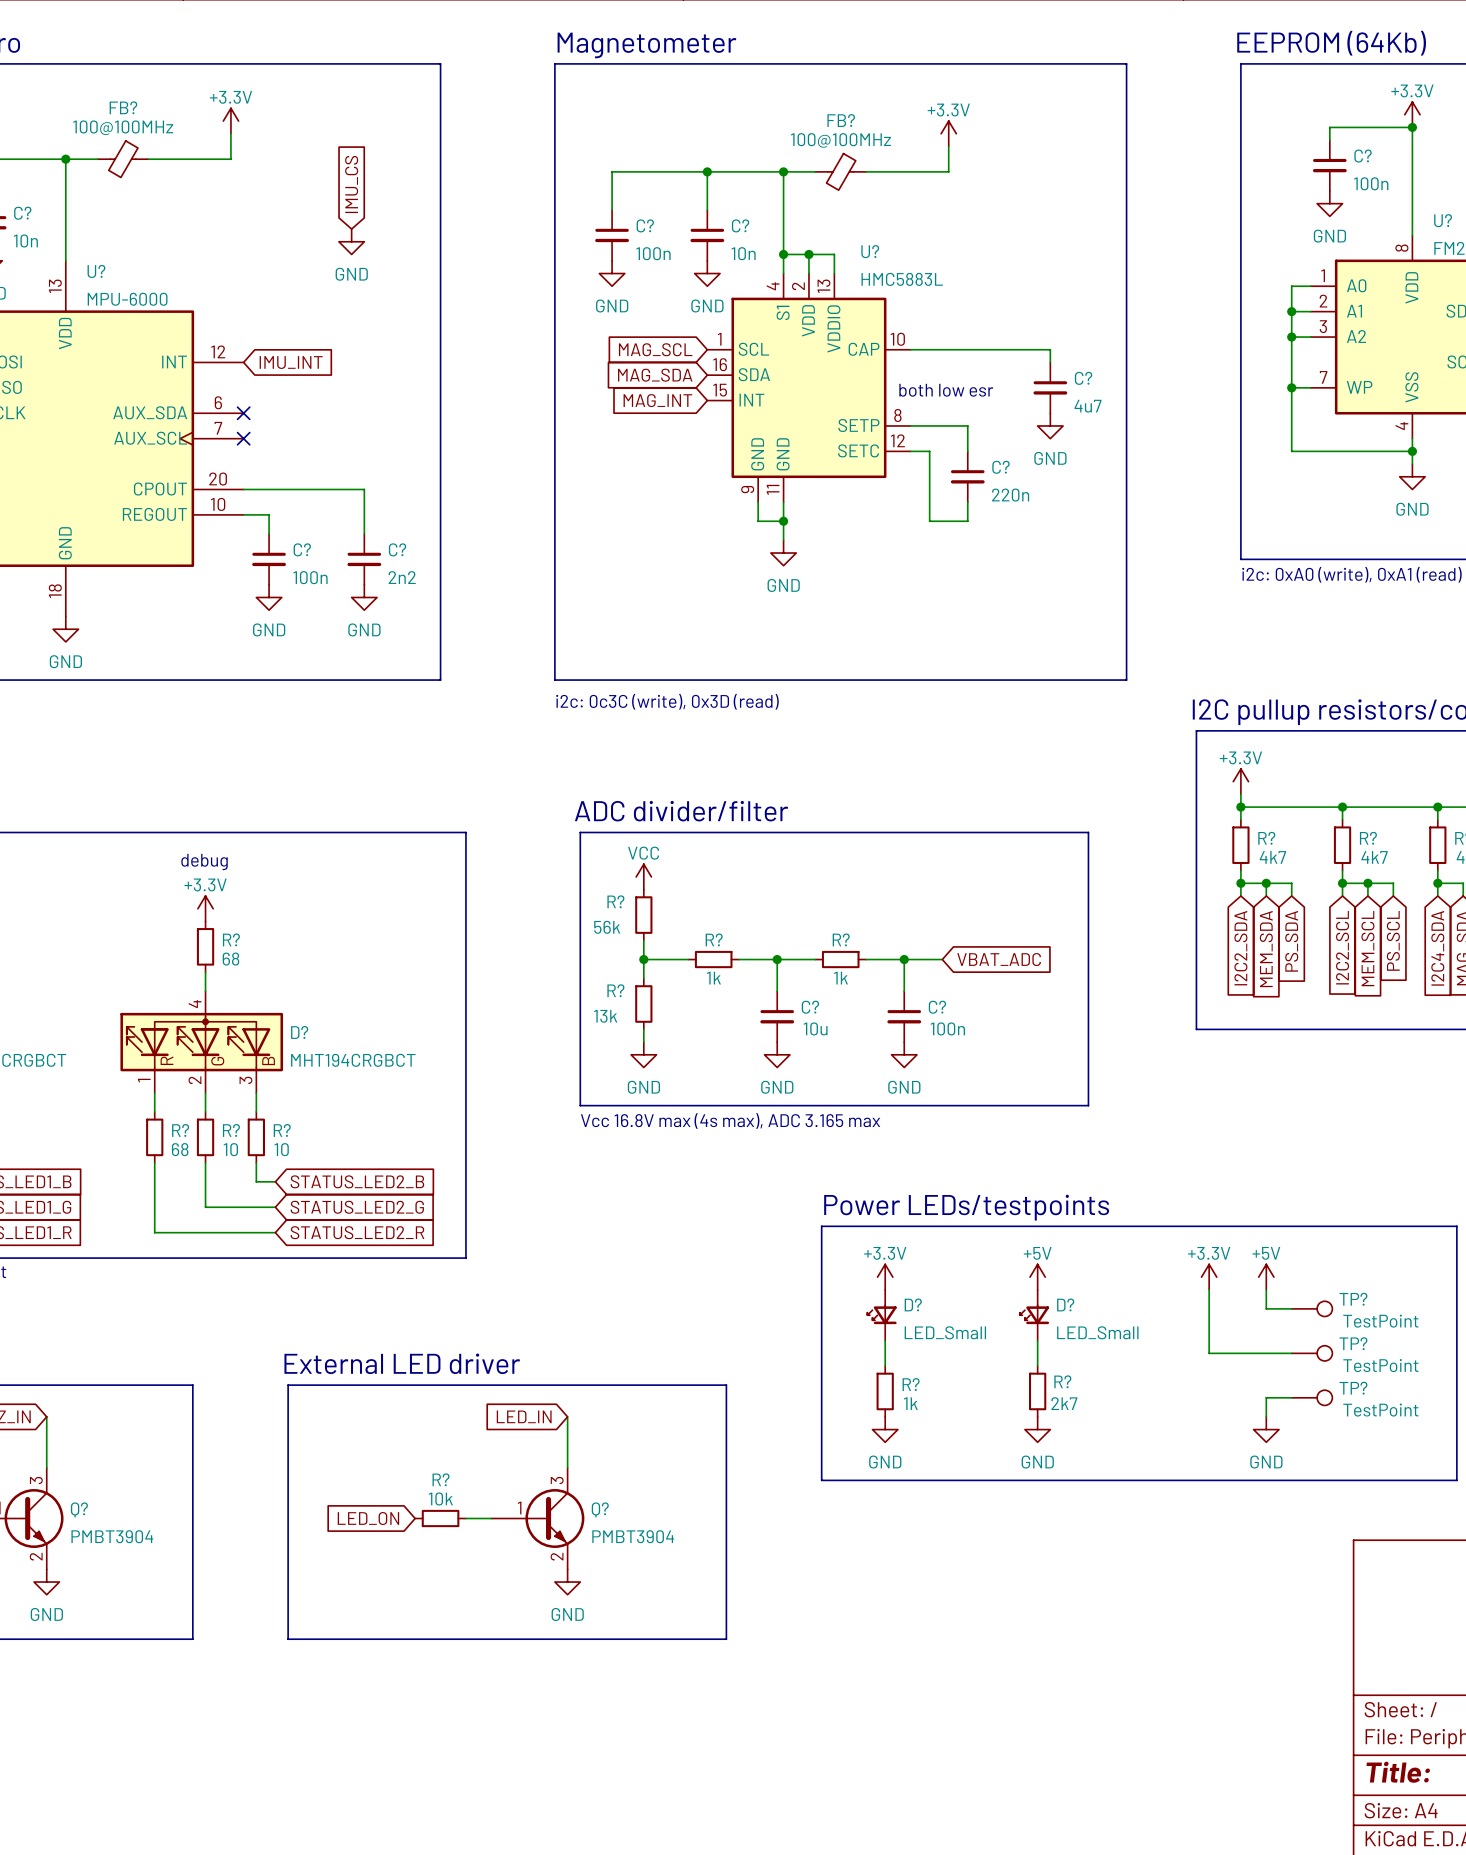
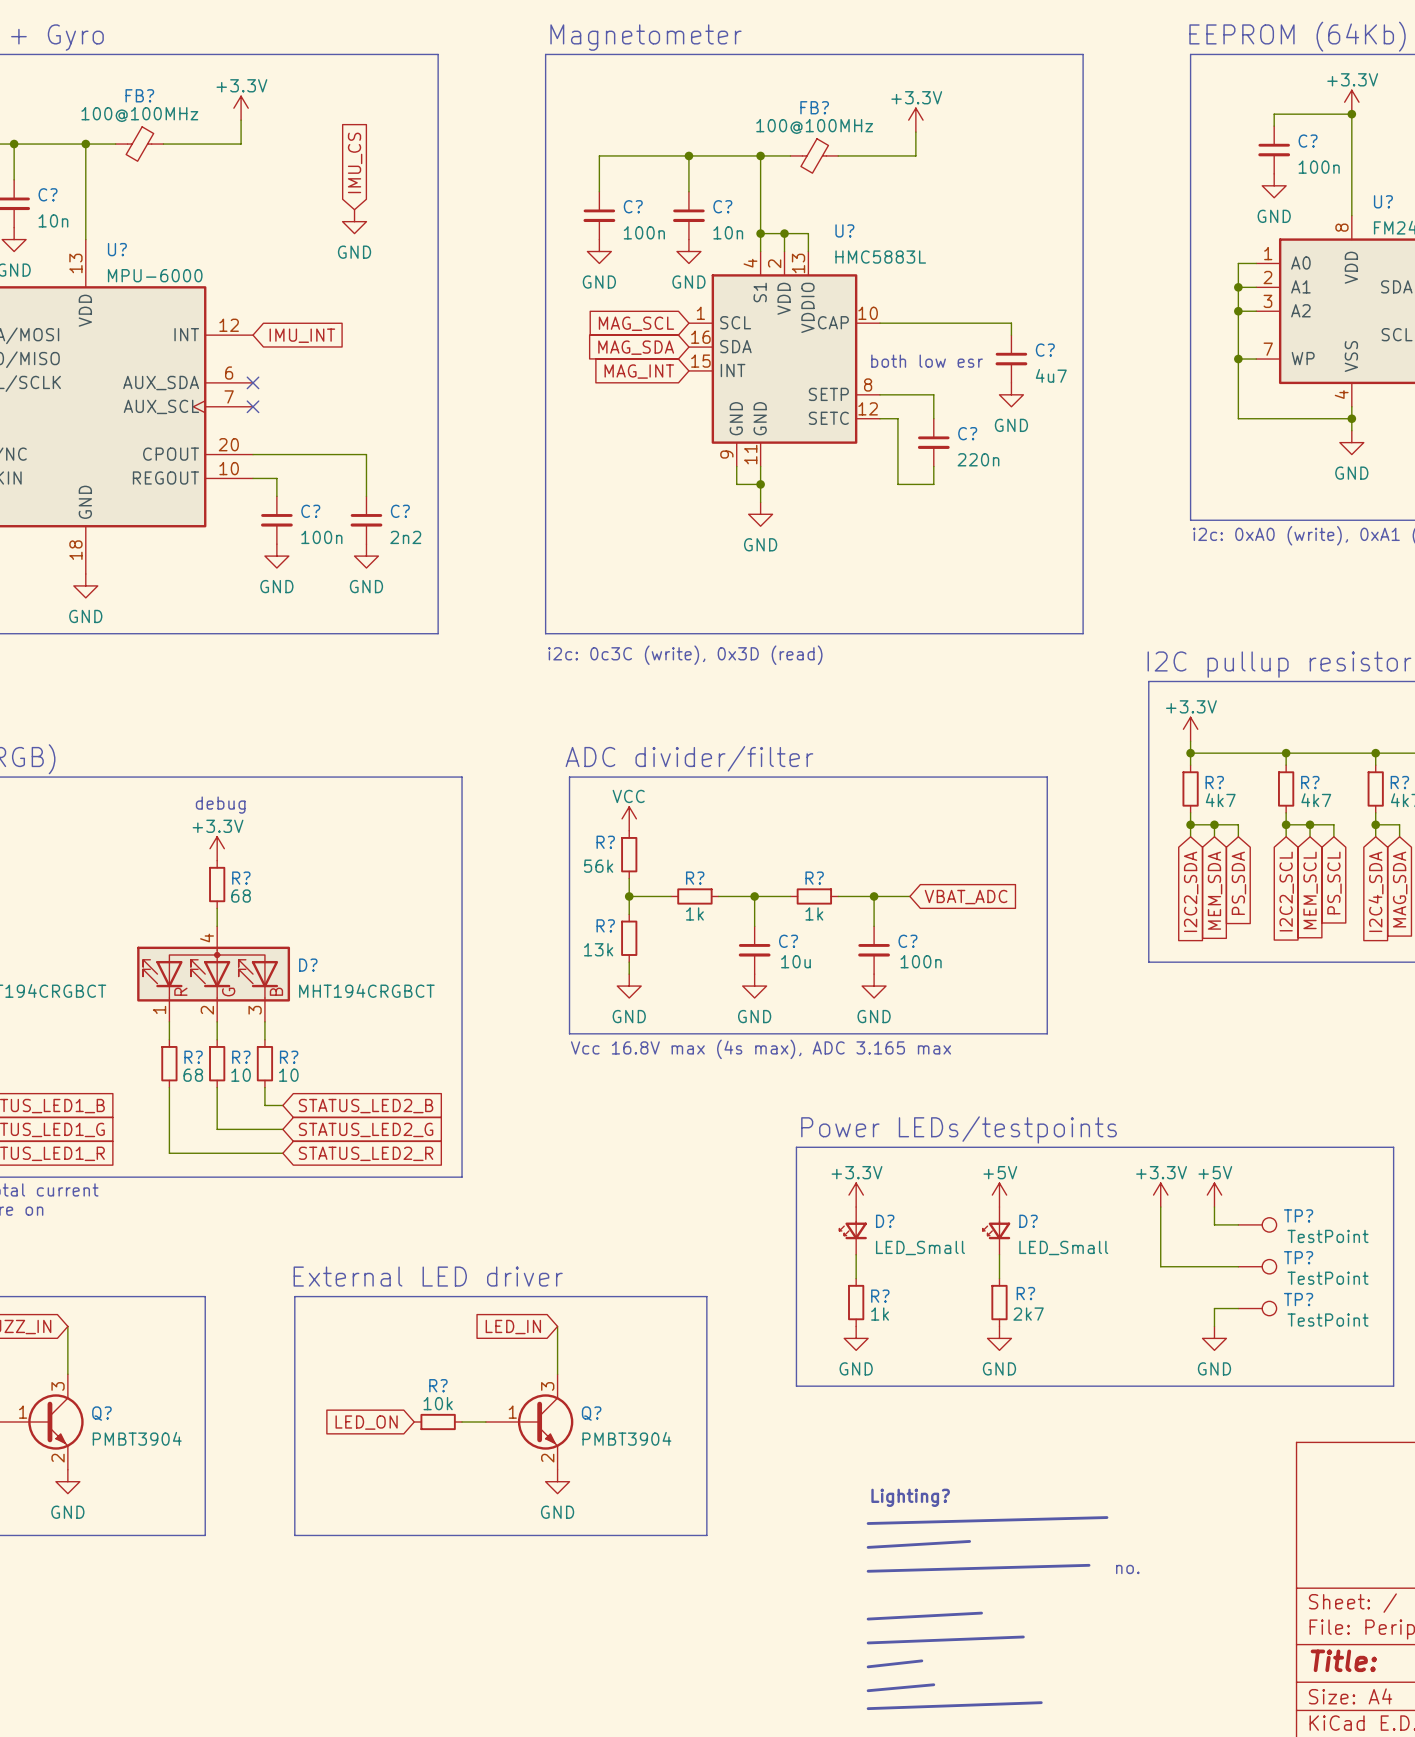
text: none -> Lighting? (910, 1497)
line: none -> (1106, 1517) (868, 1523)
line: none -> (969, 1541) (868, 1547)
line: none -> (1089, 1565) (868, 1571)
text: none -> no. (1127, 1569)
line: none -> (981, 1613) (868, 1619)
line: none -> (1023, 1636) (868, 1642)
line: none -> (921, 1660) (868, 1666)
line: none -> (933, 1684) (868, 1690)
line: none -> (1041, 1702) (868, 1708)

